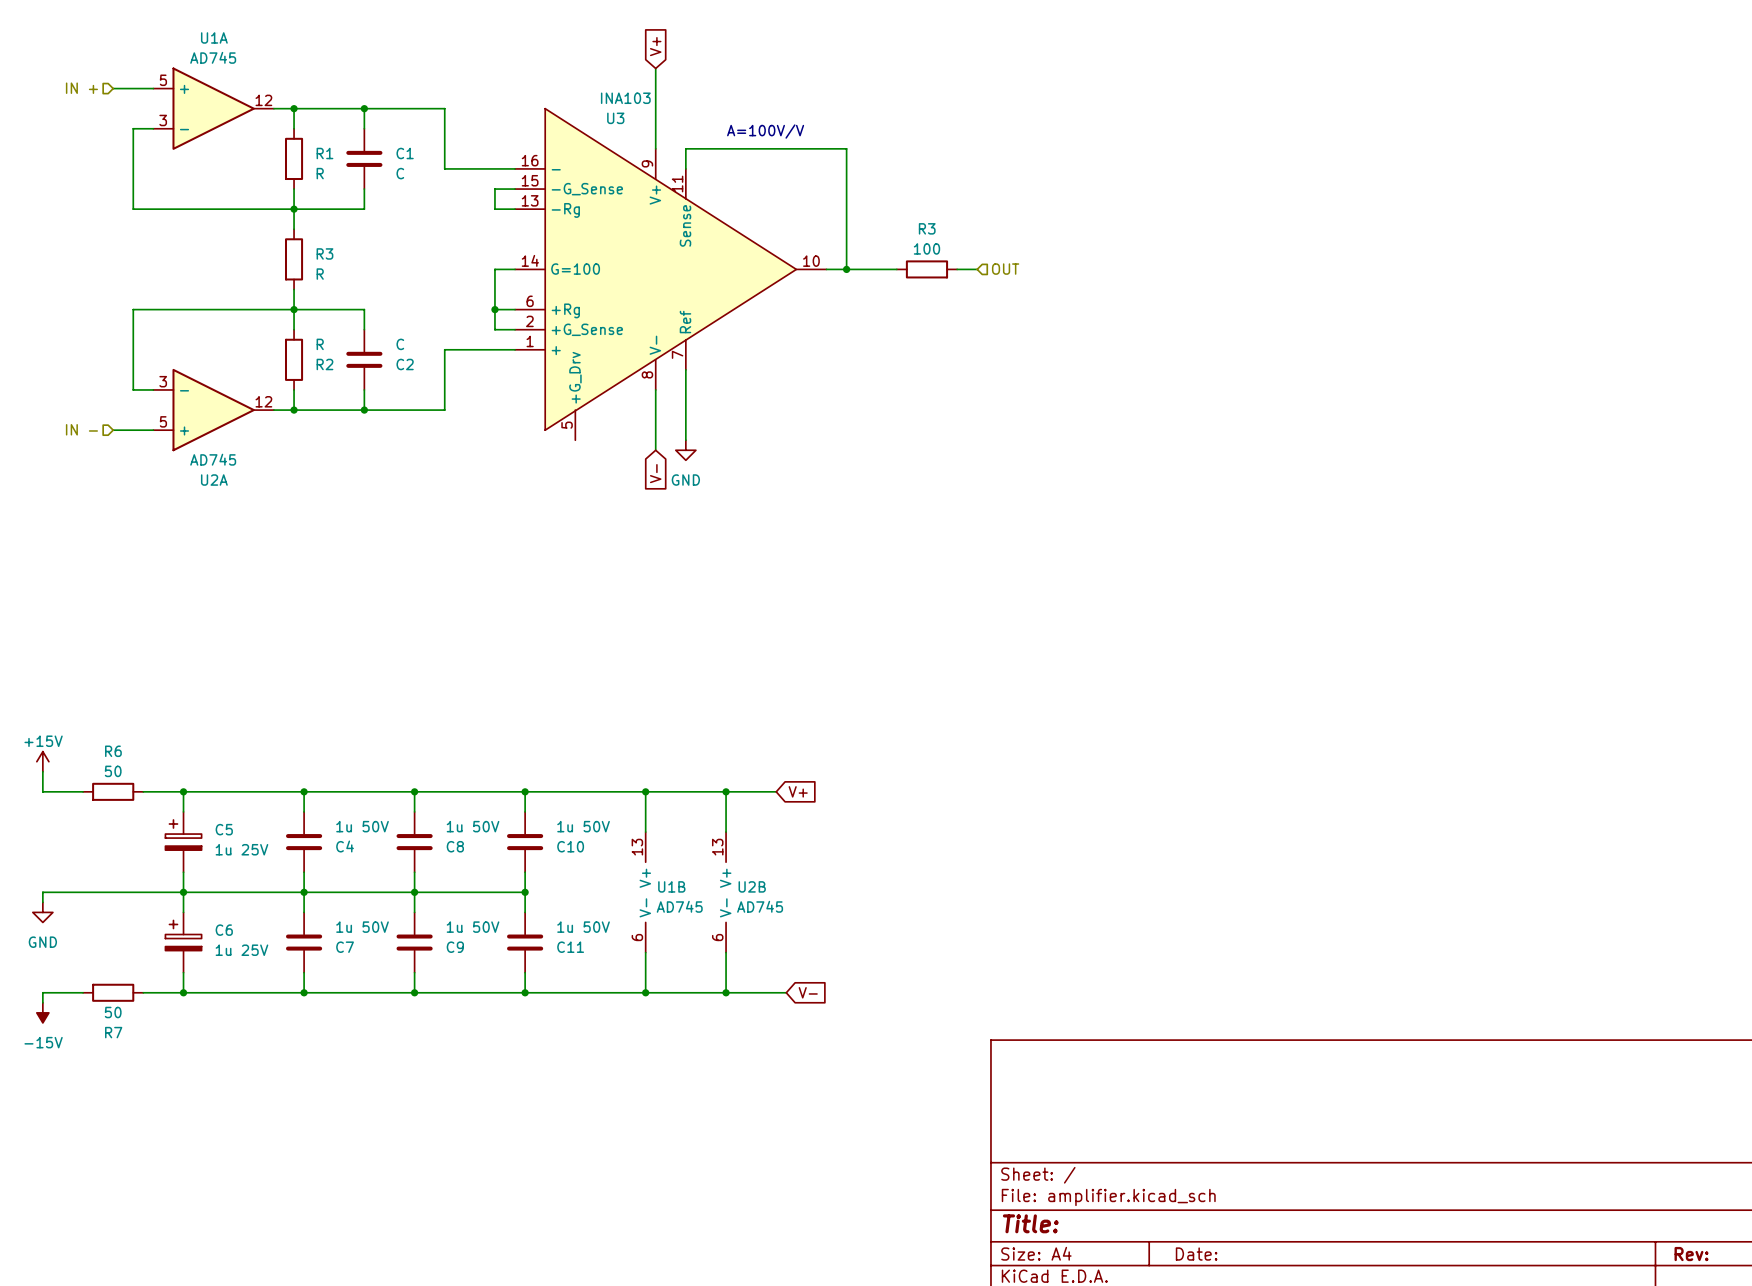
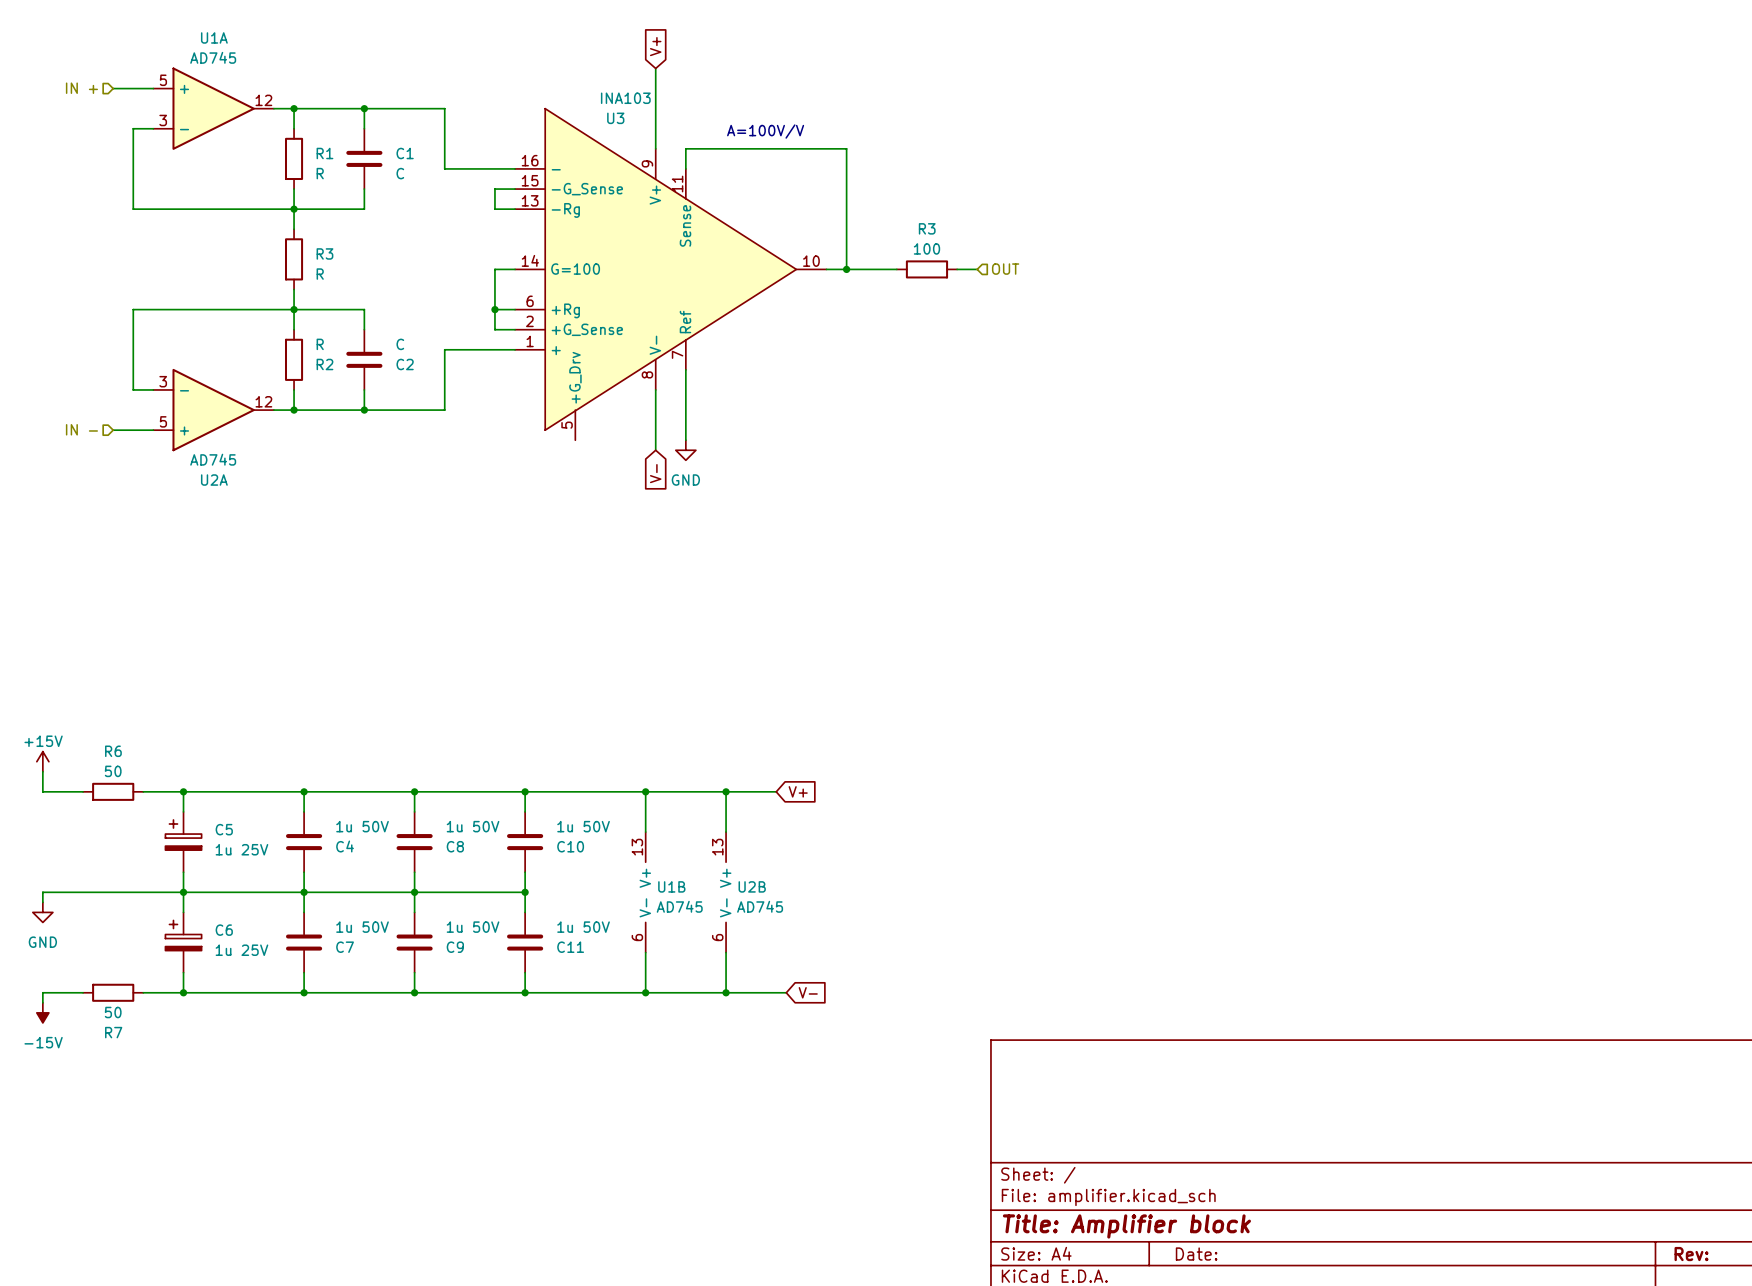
title block: Title: (1030, 1223) -> Title: Amplifier block (1126, 1226)

